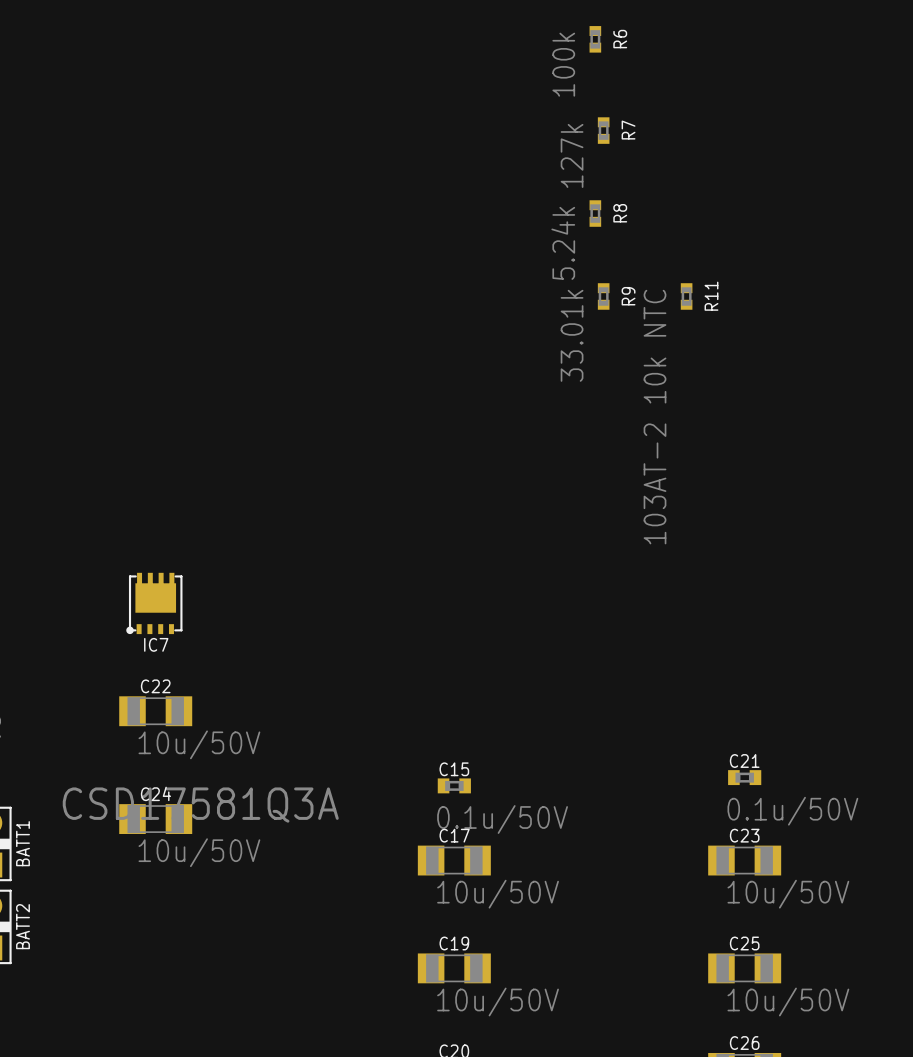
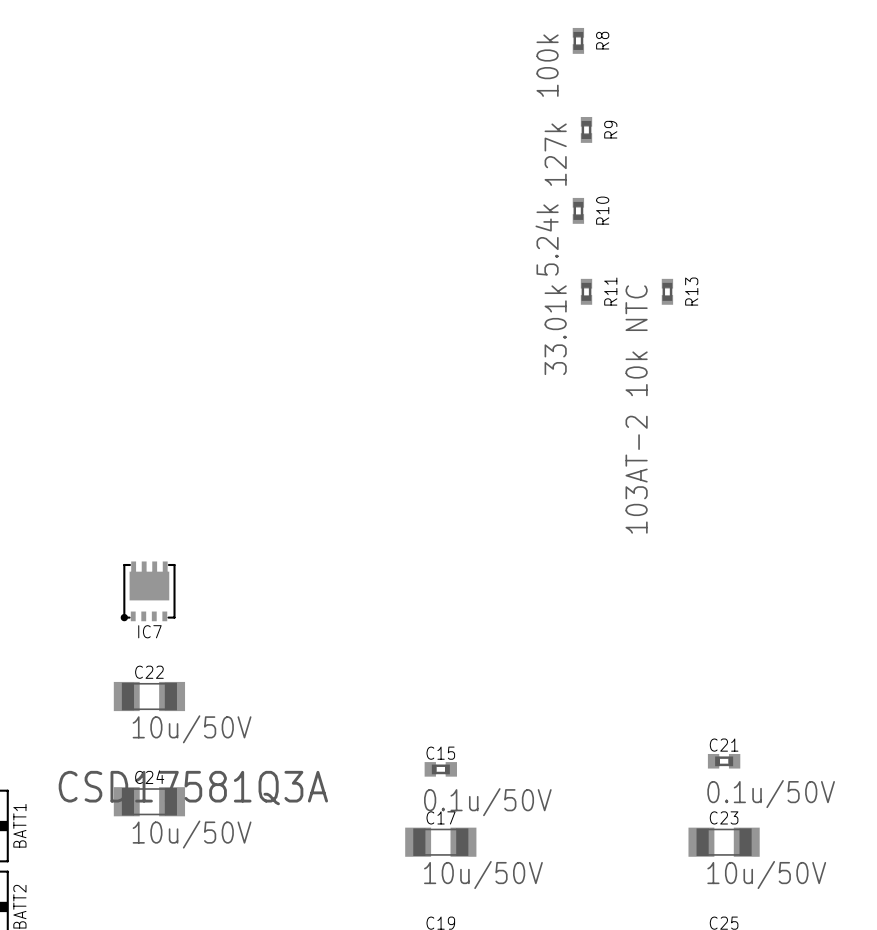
R6 name: R6 (620, 39) -> R8 (602, 40)
R7 name: R7 (628, 130) -> R9 (610, 129)
R8 name: R8 (620, 213) -> R10 (602, 210)
R9 name: R9 (628, 296) -> R11 (610, 291)
R11 name: R11 (711, 296) -> R13 (691, 291)

